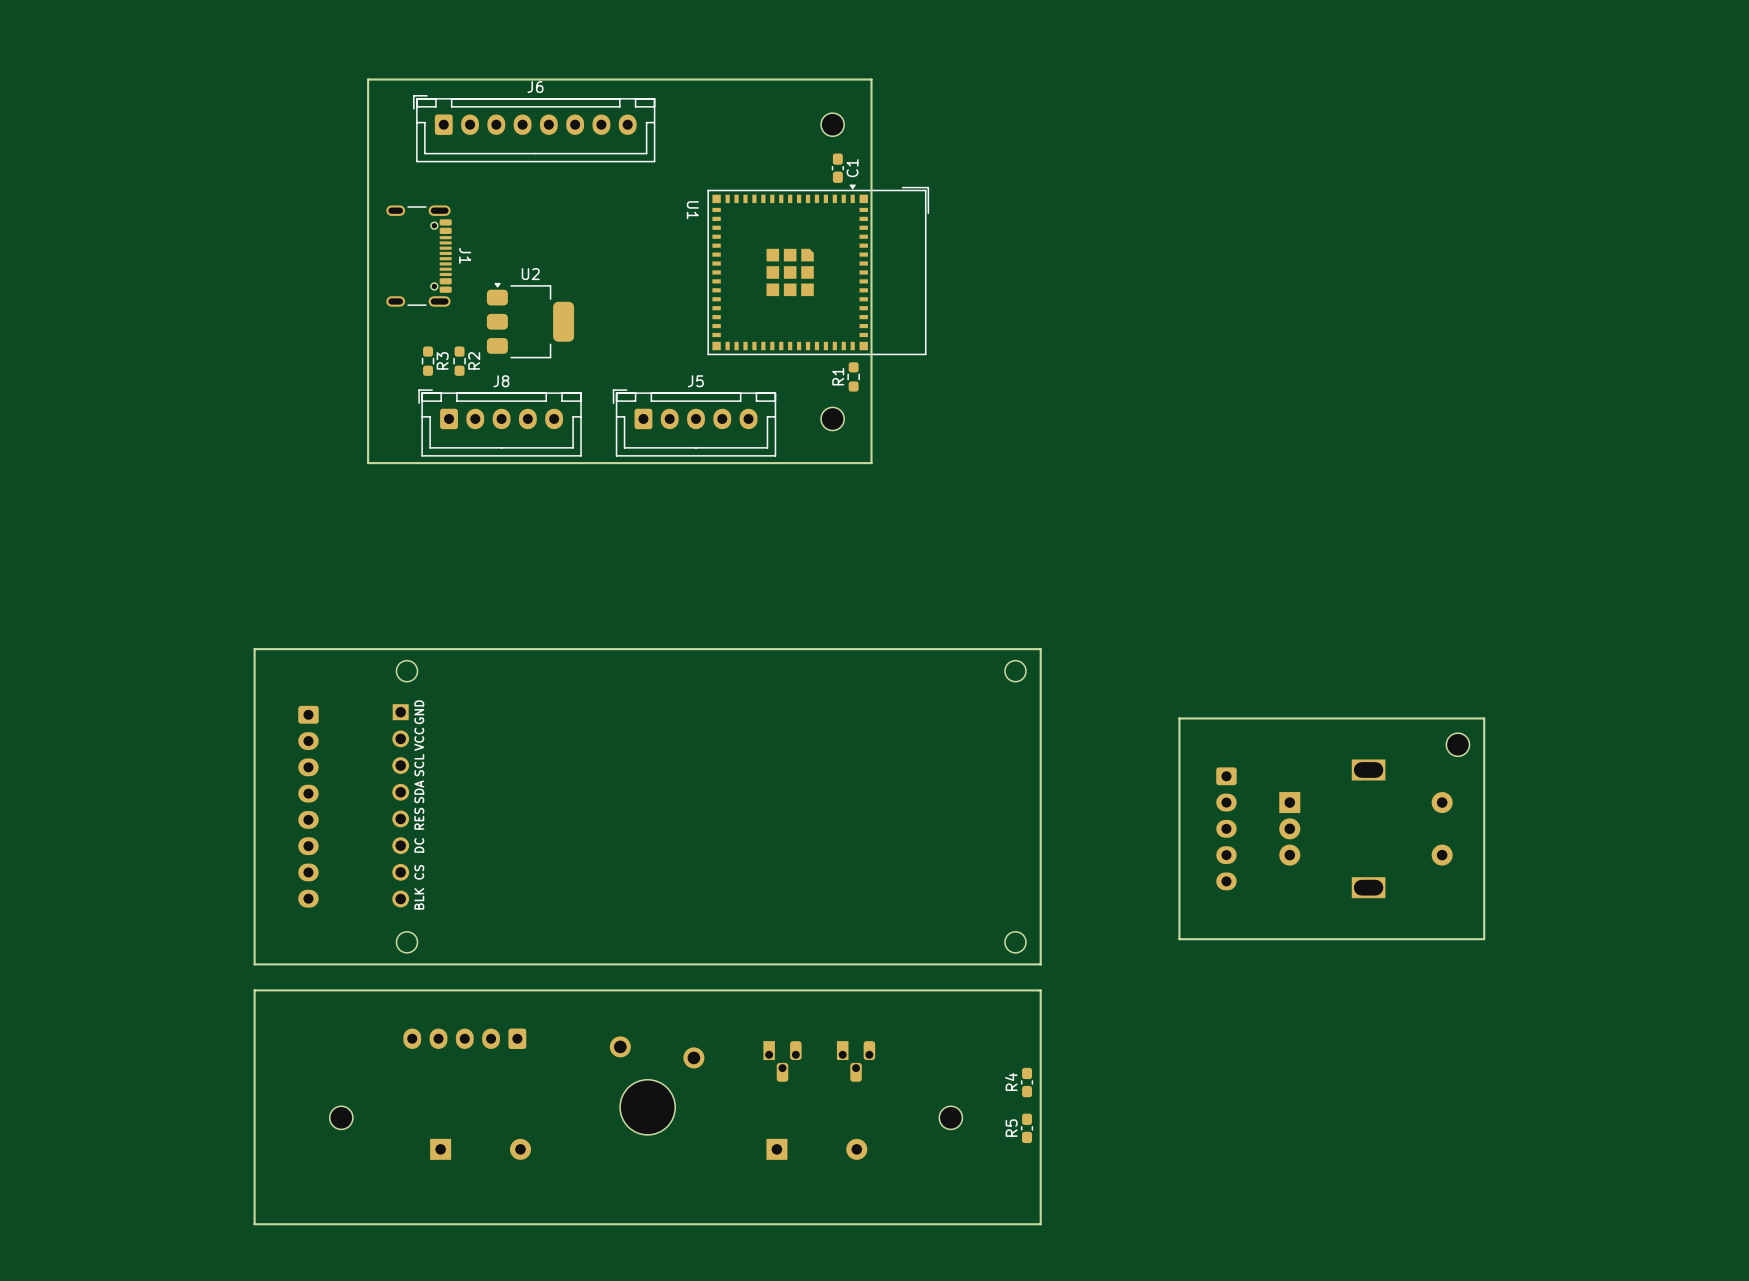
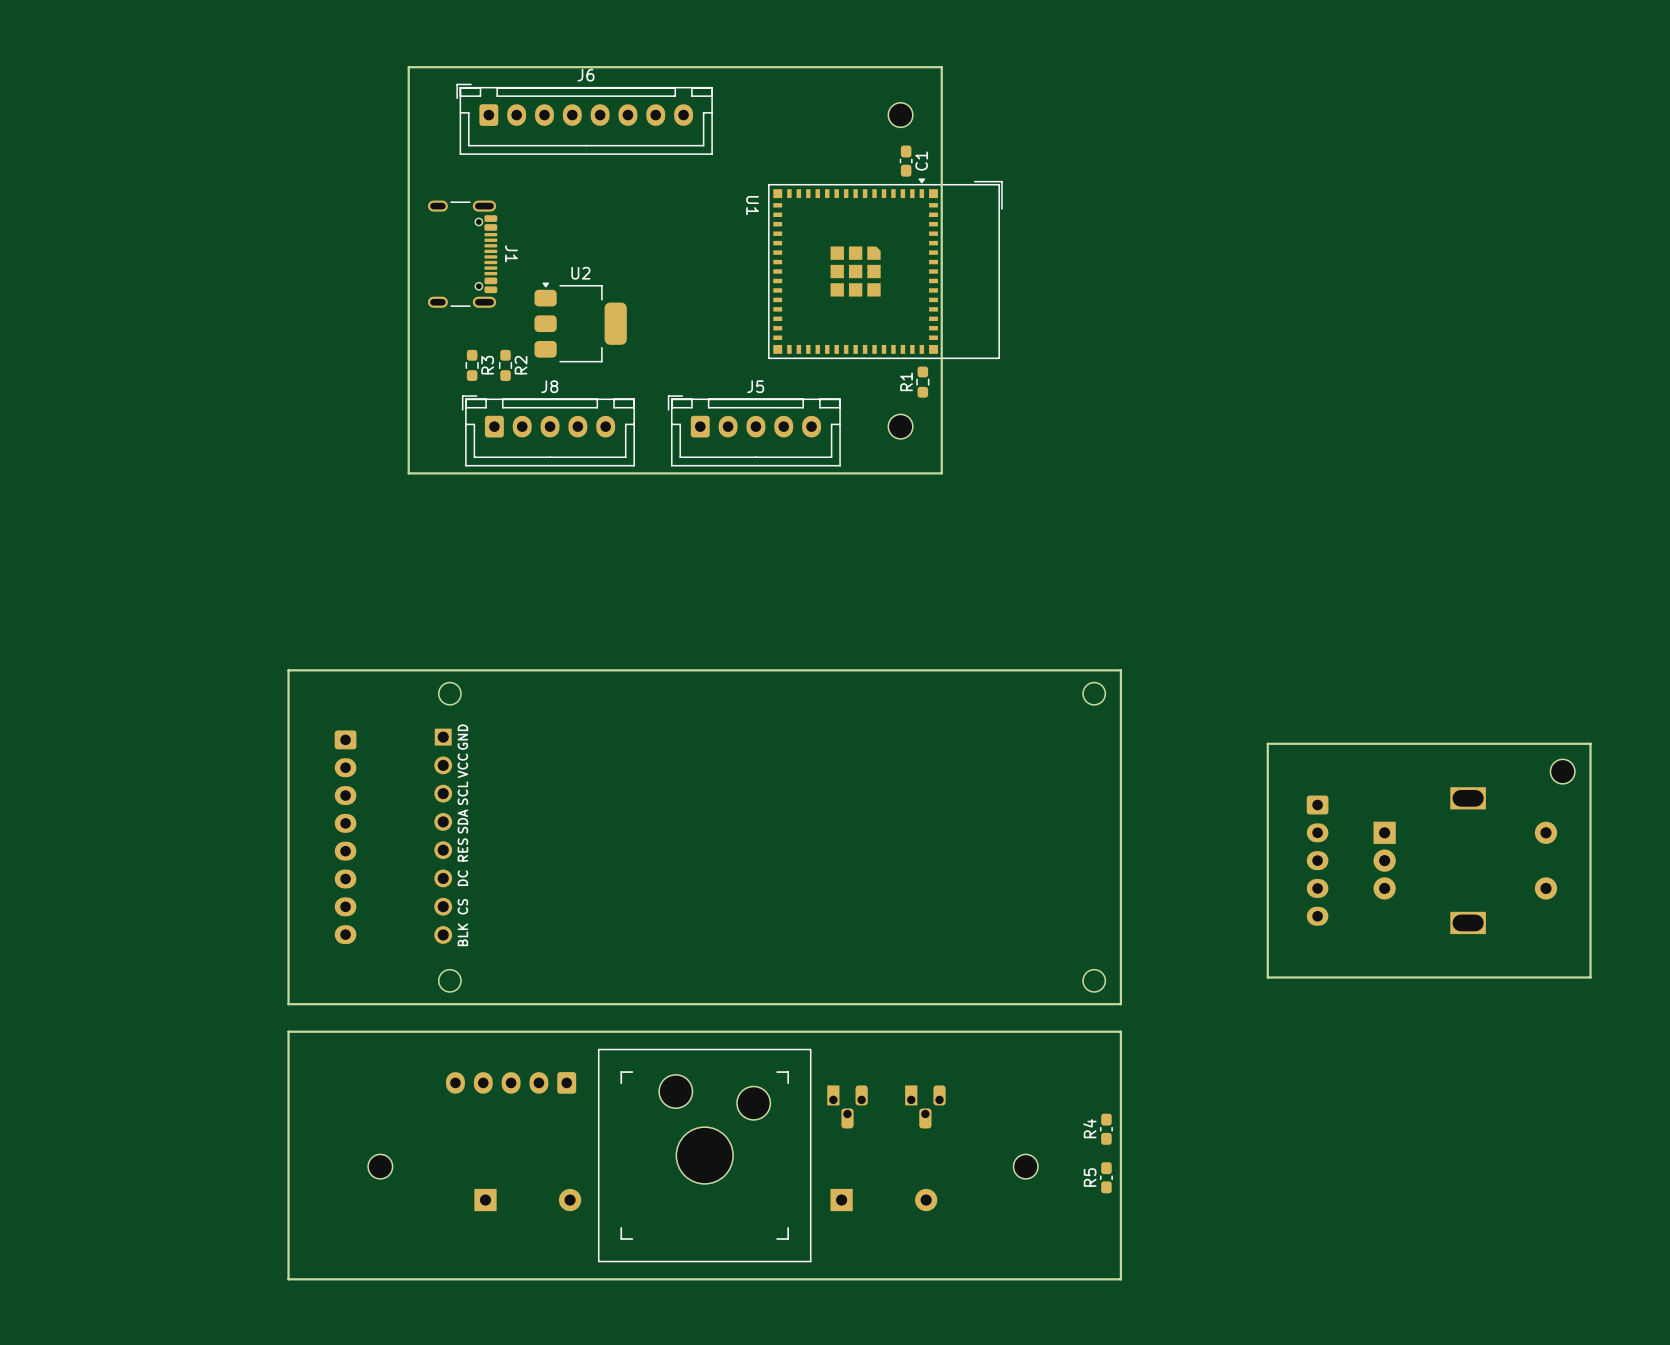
part: (657, 1085) -> none
part: none -> (704, 1155)

